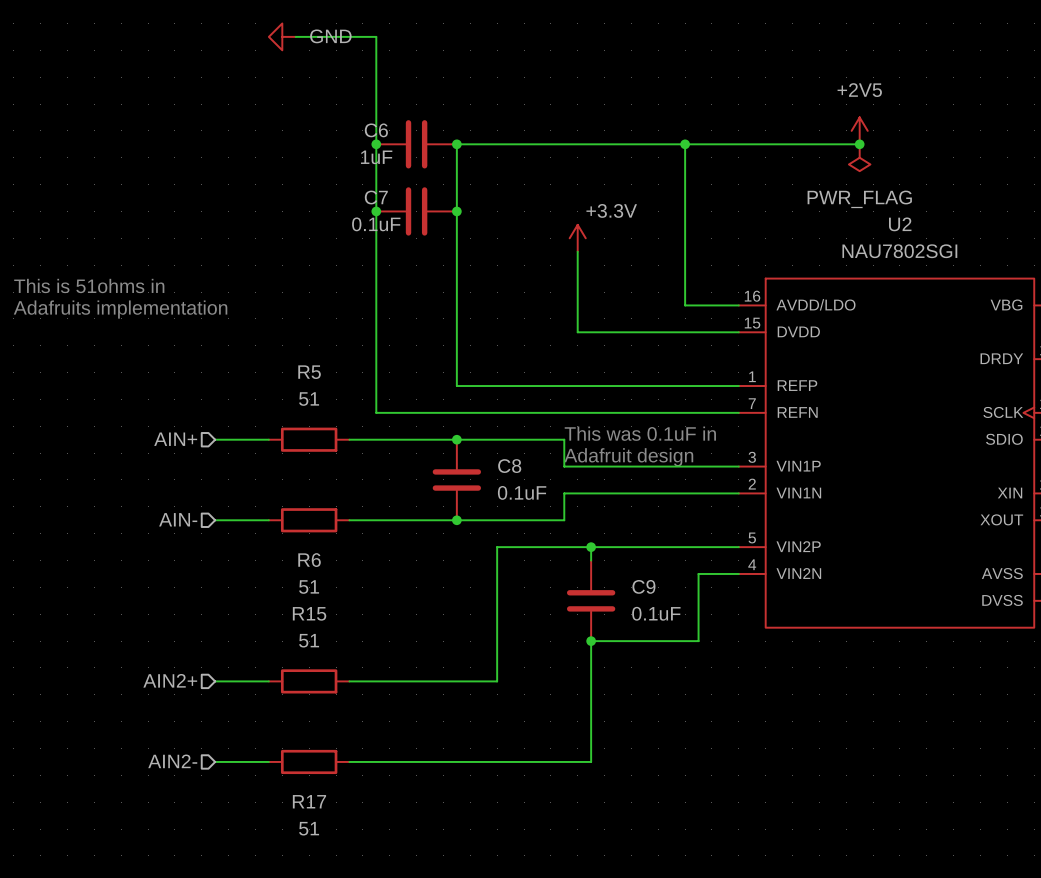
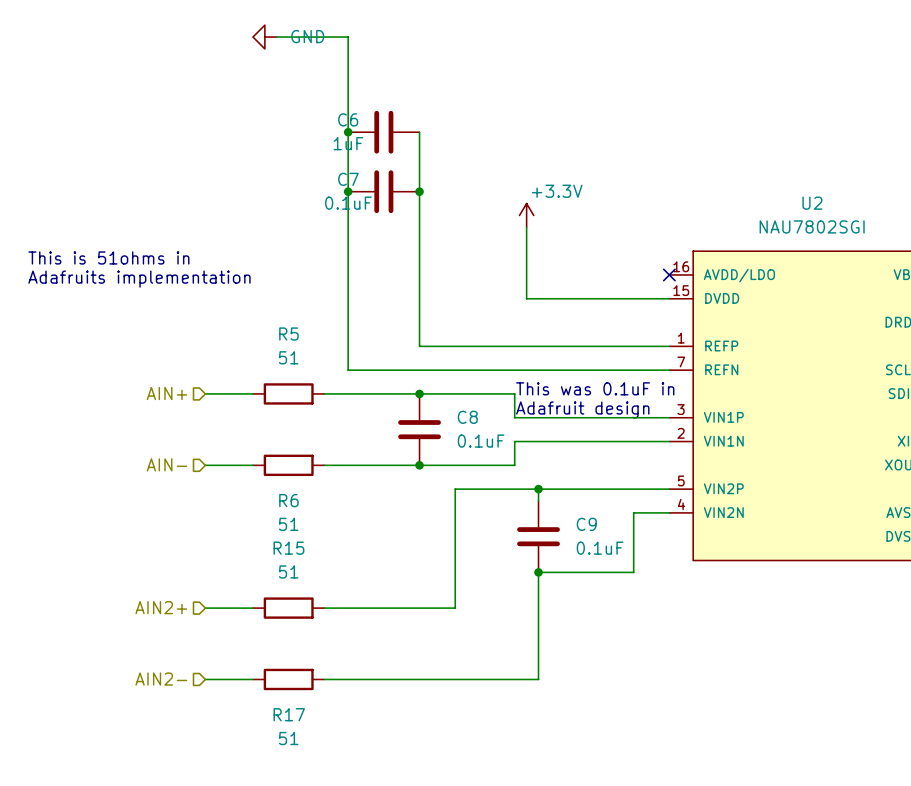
power symbol: +2V5 (859, 130) -> none
wire: (456, 144) (859, 144) -> none
junction: (456, 144) -> none
wire: (685, 144) (685, 305) (738, 305) -> none
junction: (685, 144) -> none
junction: (859, 144) -> none
power symbol: PWR_FLAG (859, 157) -> none
no-connect mark: none -> (669, 274)

